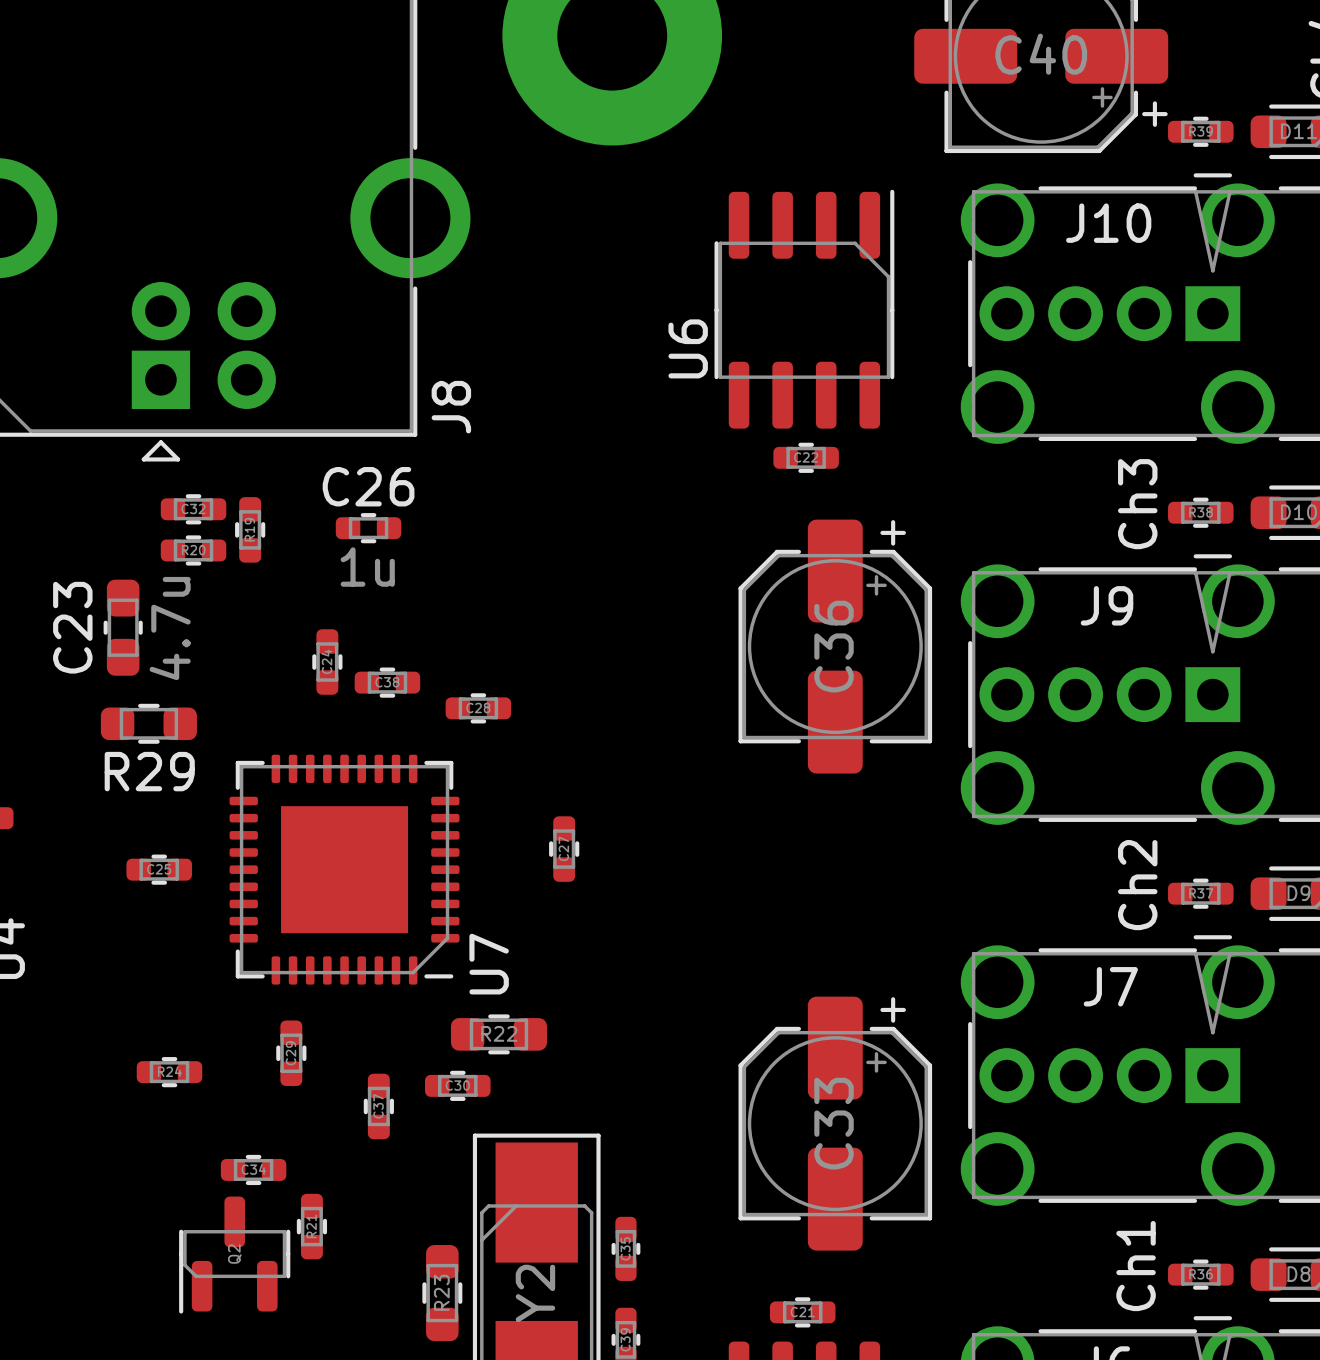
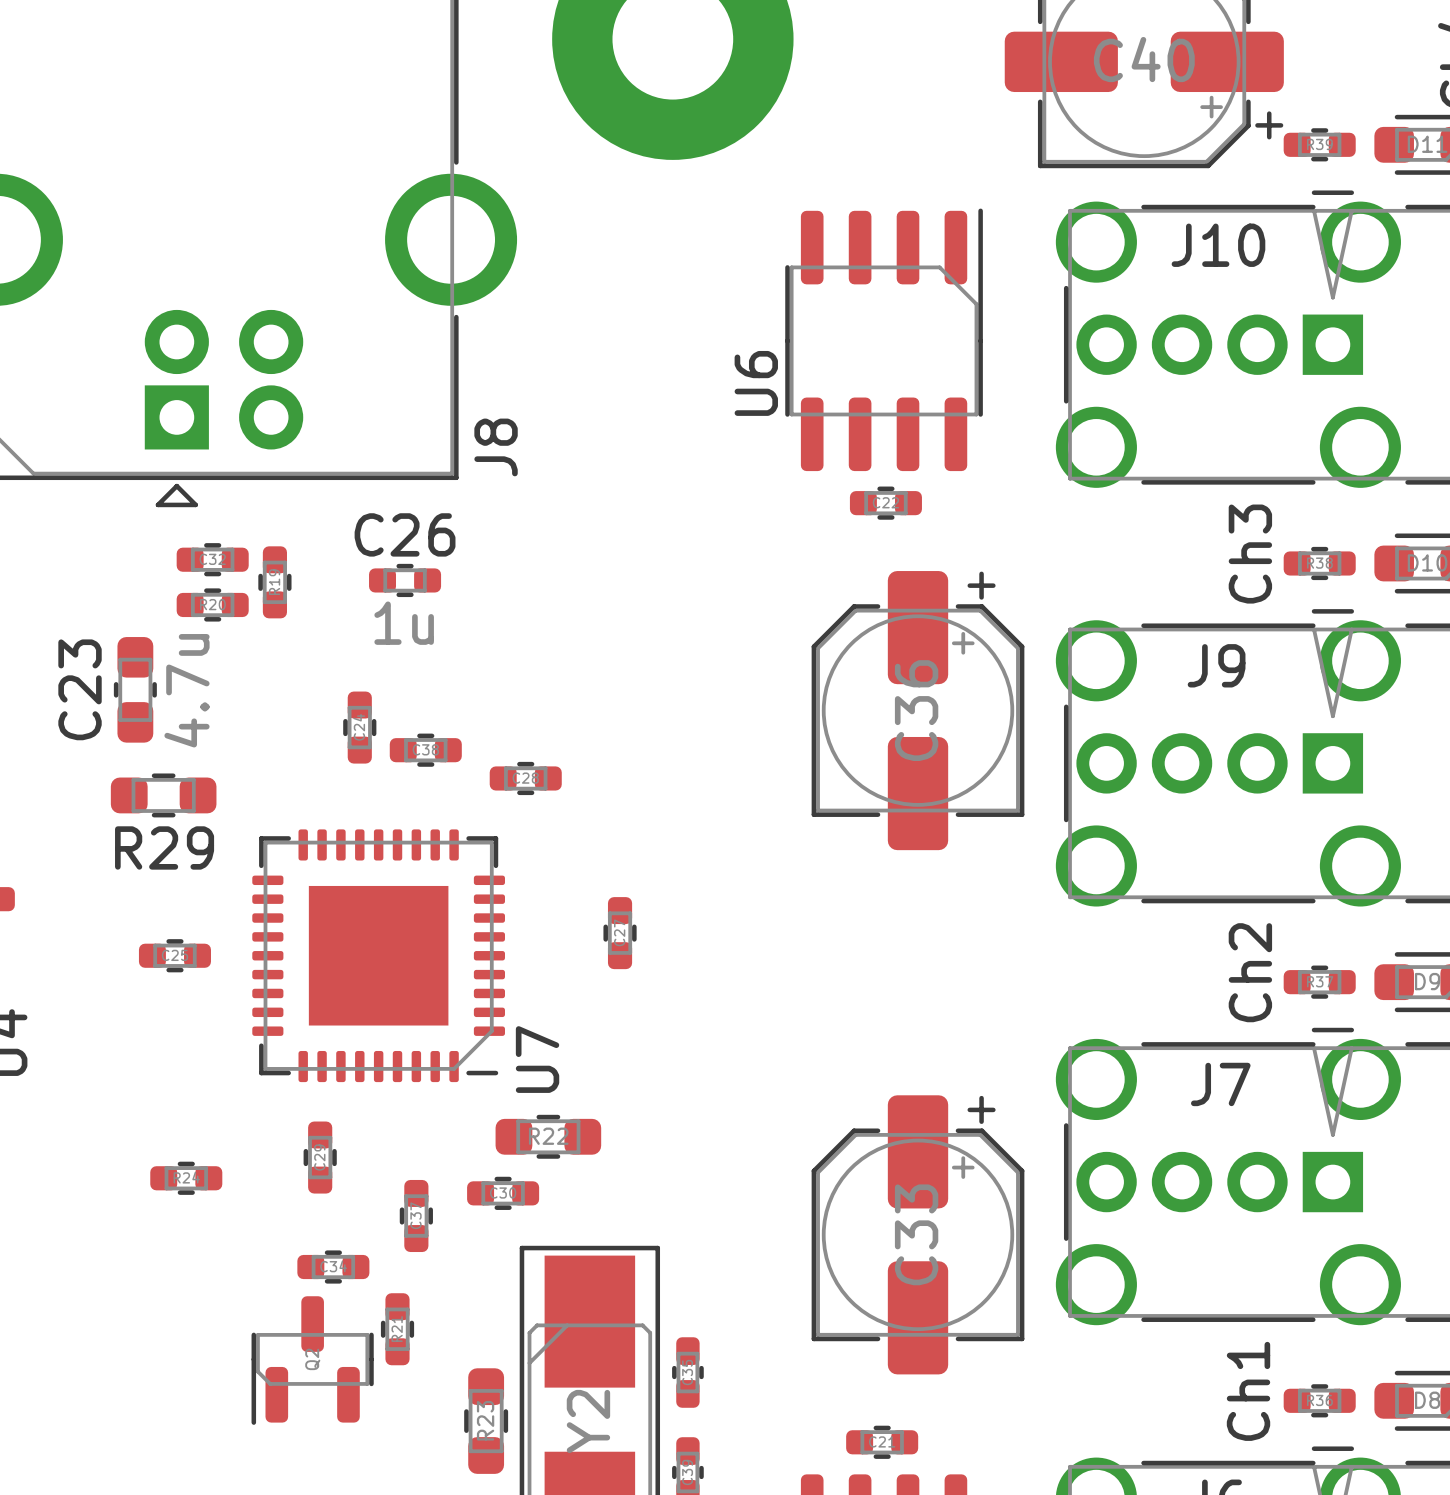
C34 position: (253, 1169) -> (333, 1267)
R21 position: (311, 1226) -> (397, 1329)
Q2 position: (234, 1255) -> (312, 1360)

